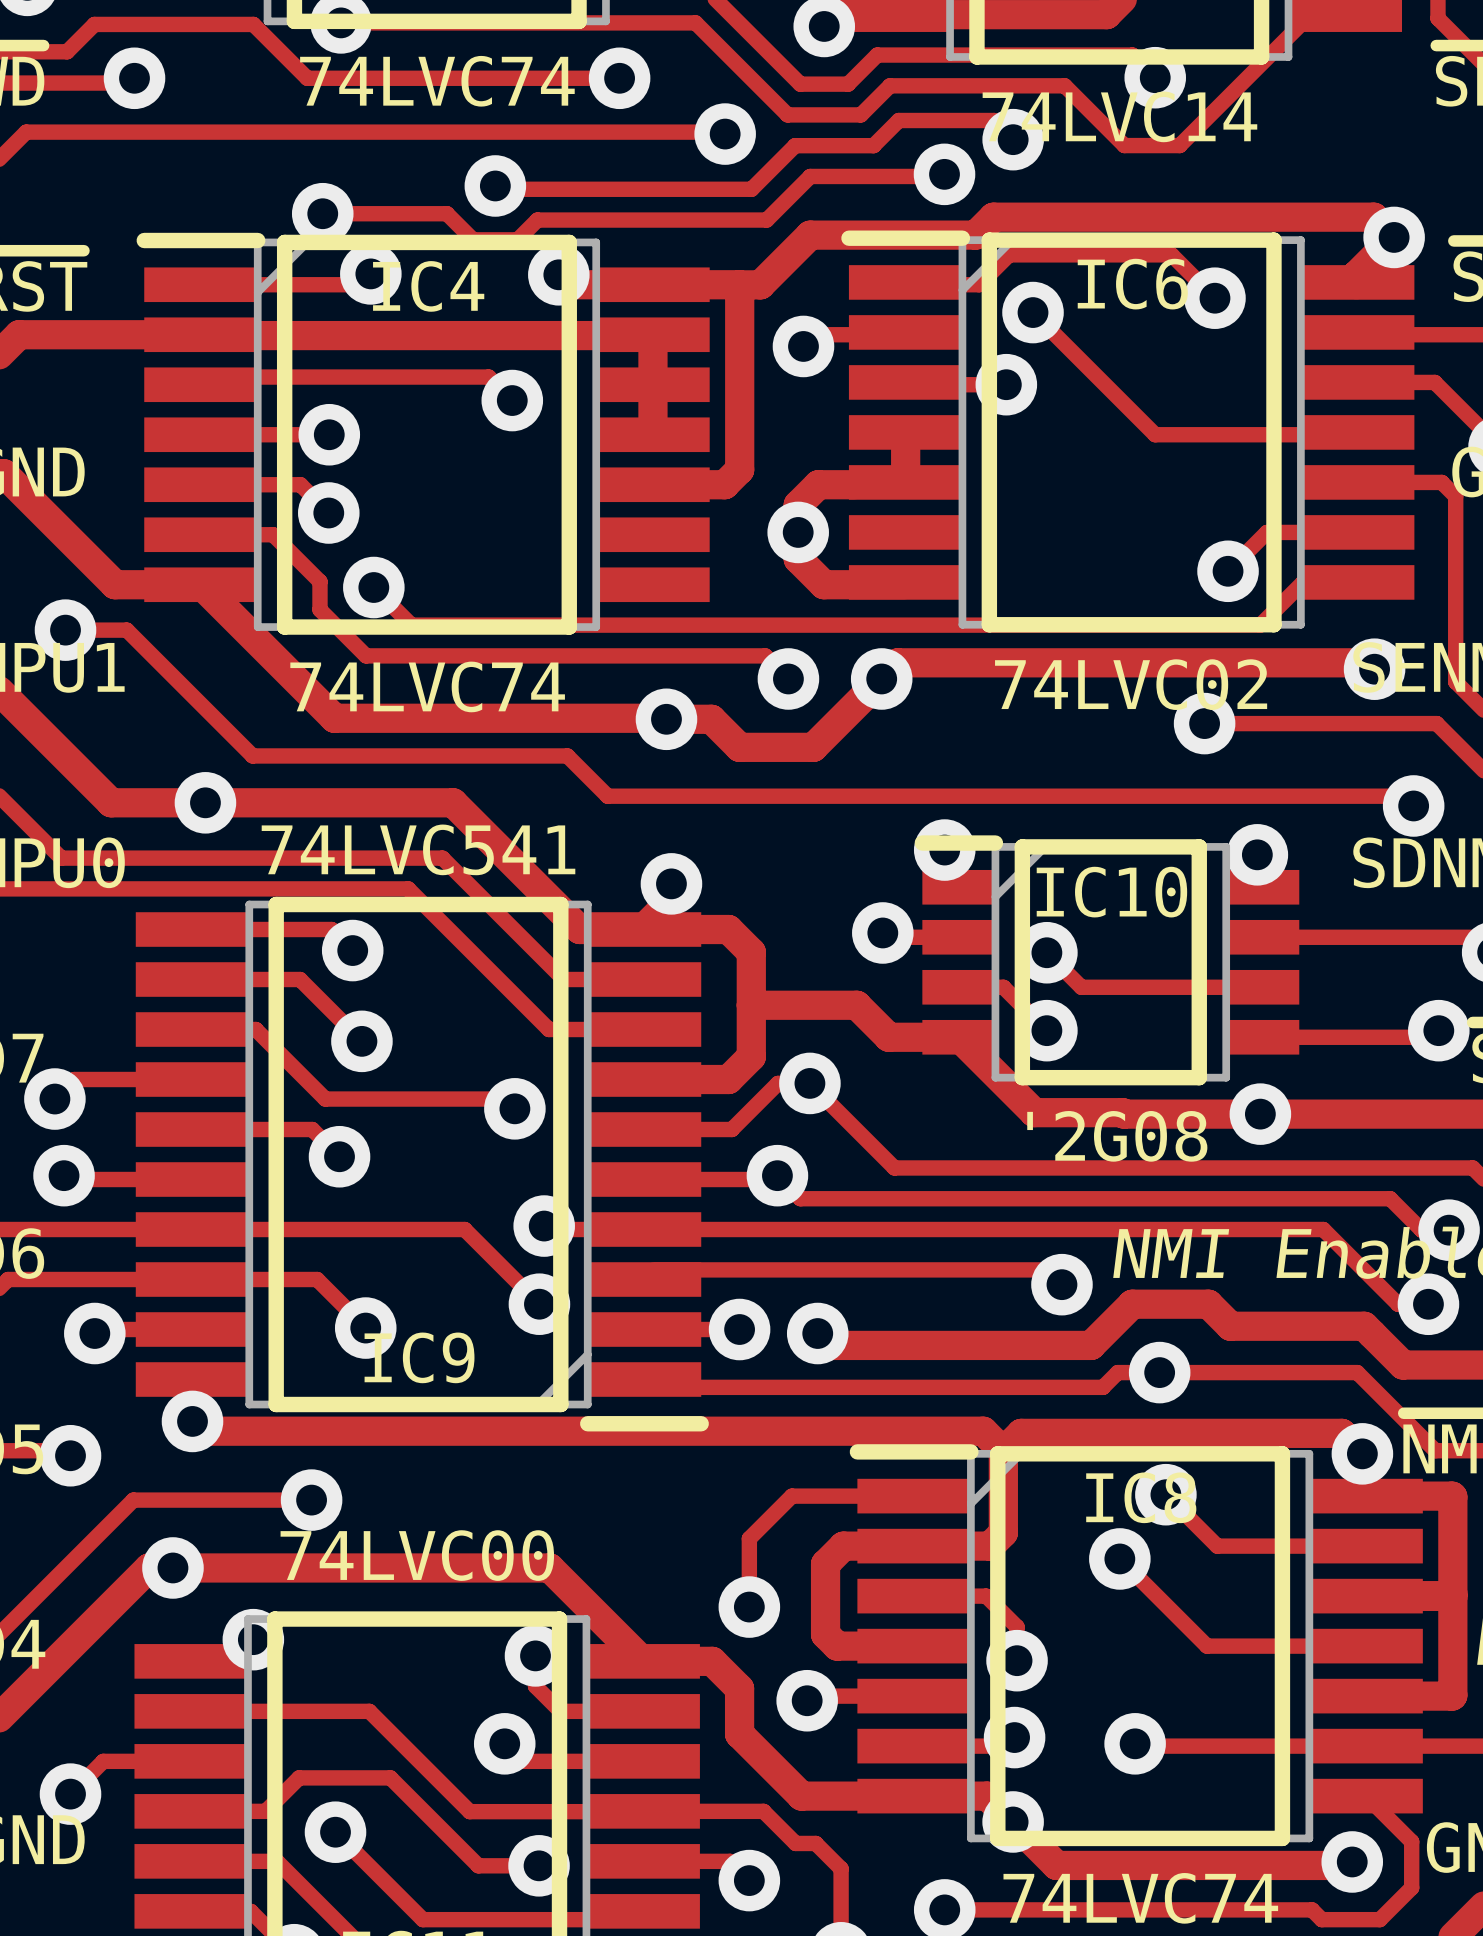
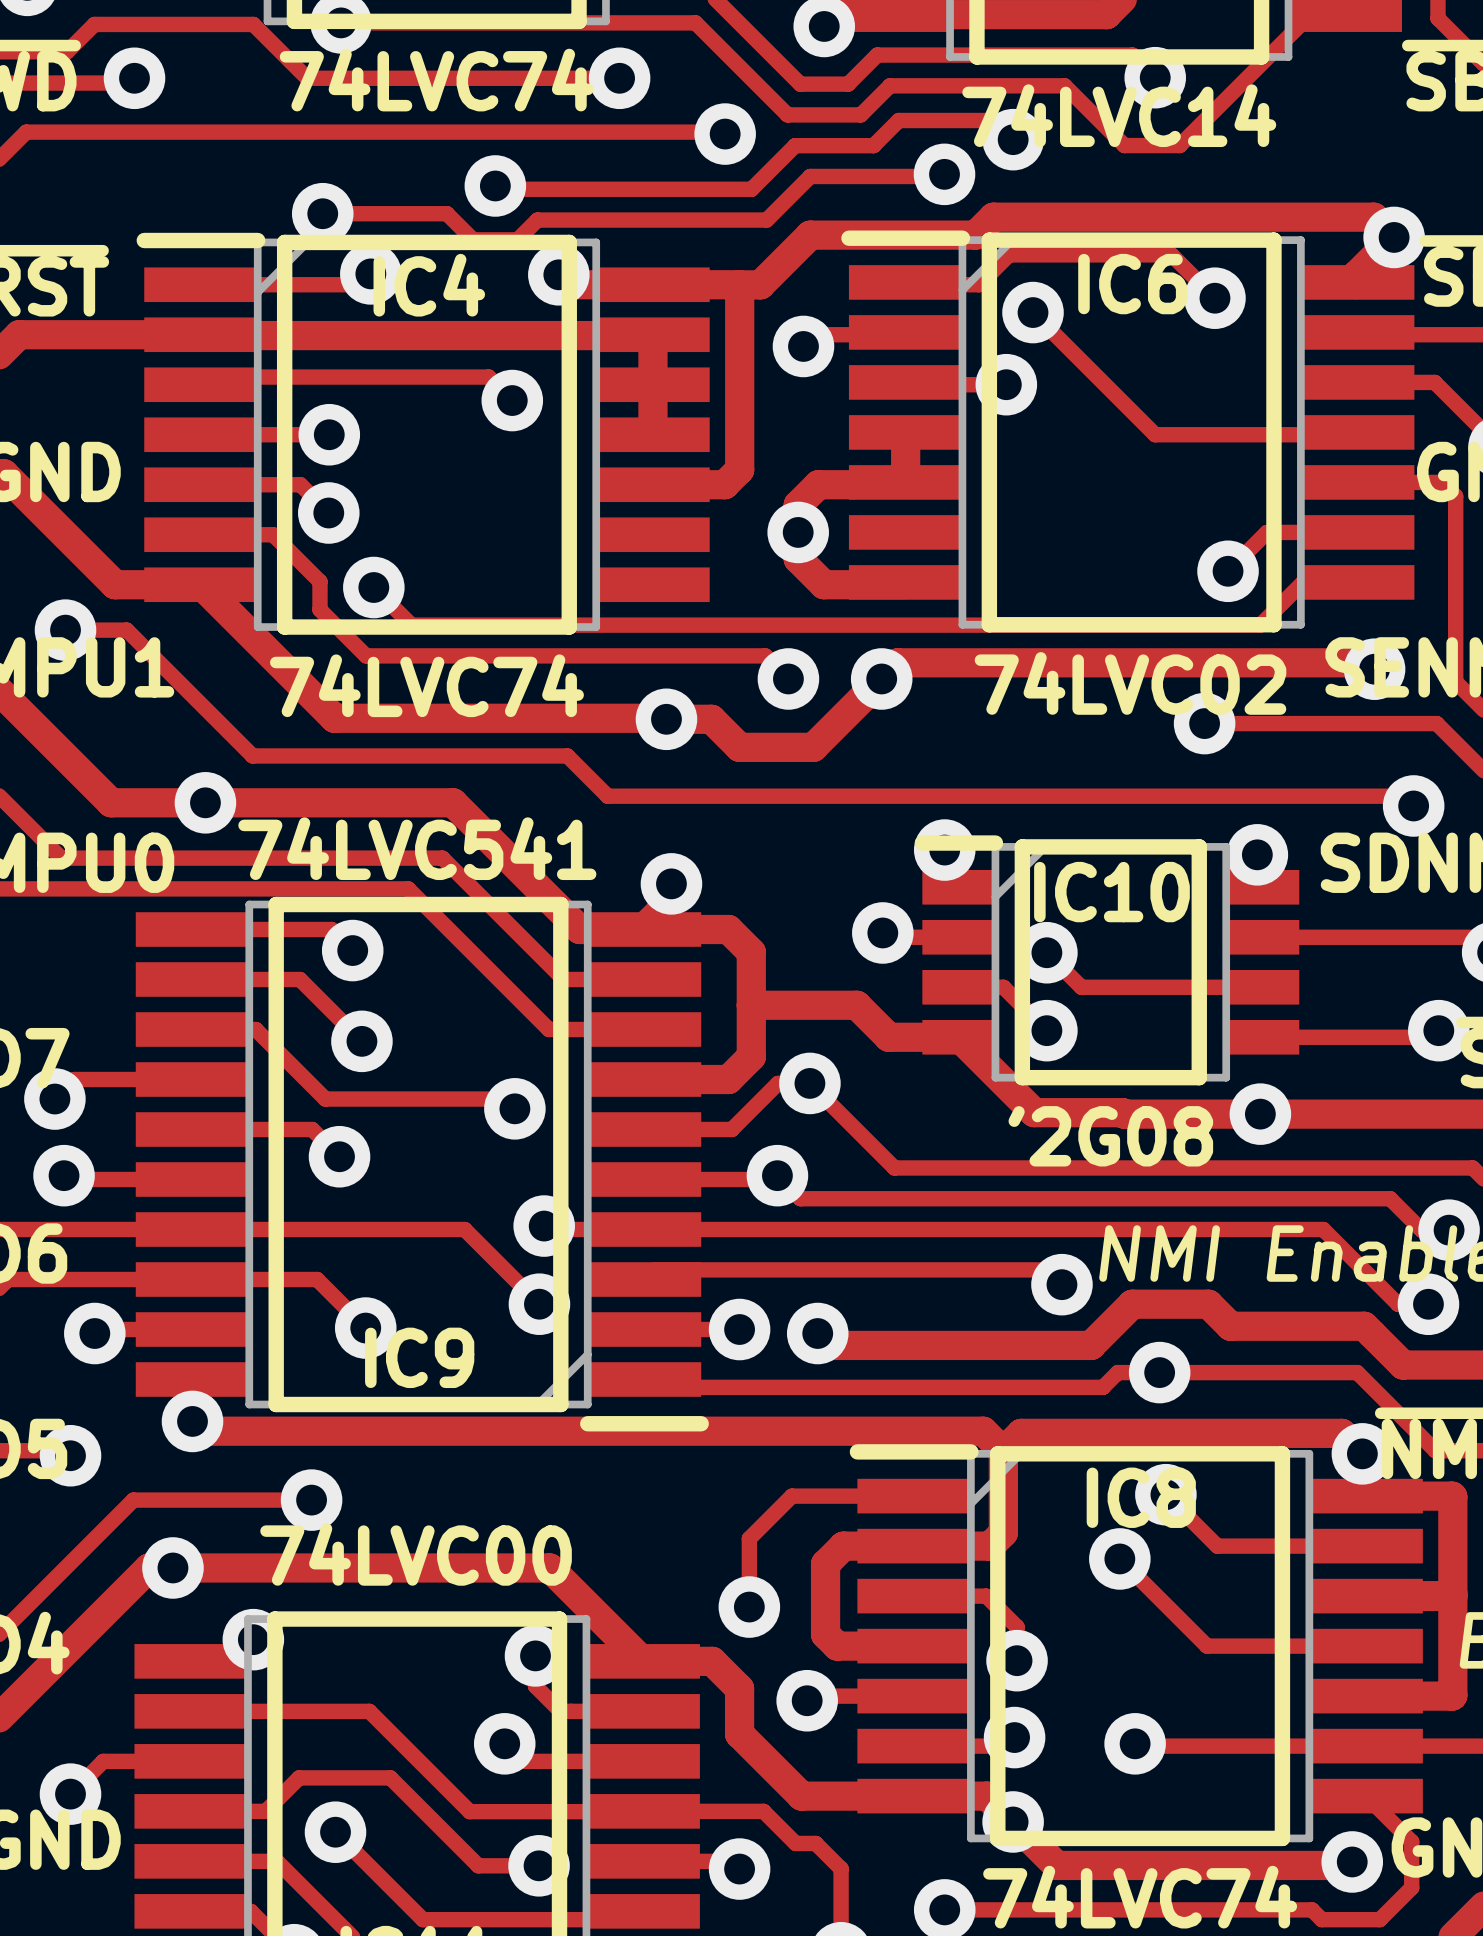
via position: (749, 1880) -> (739, 1869)

